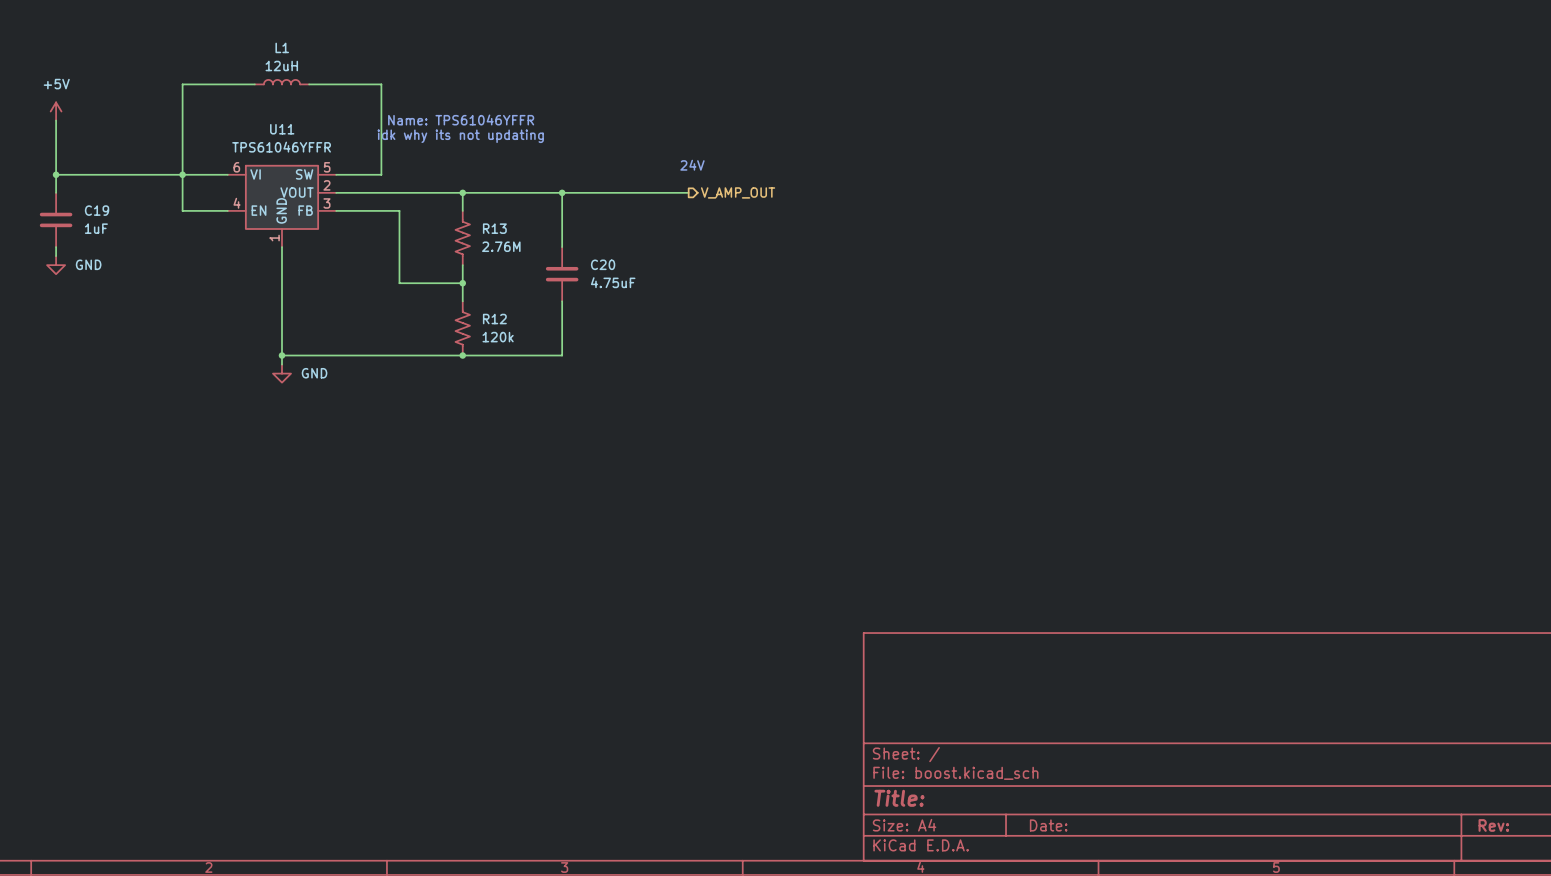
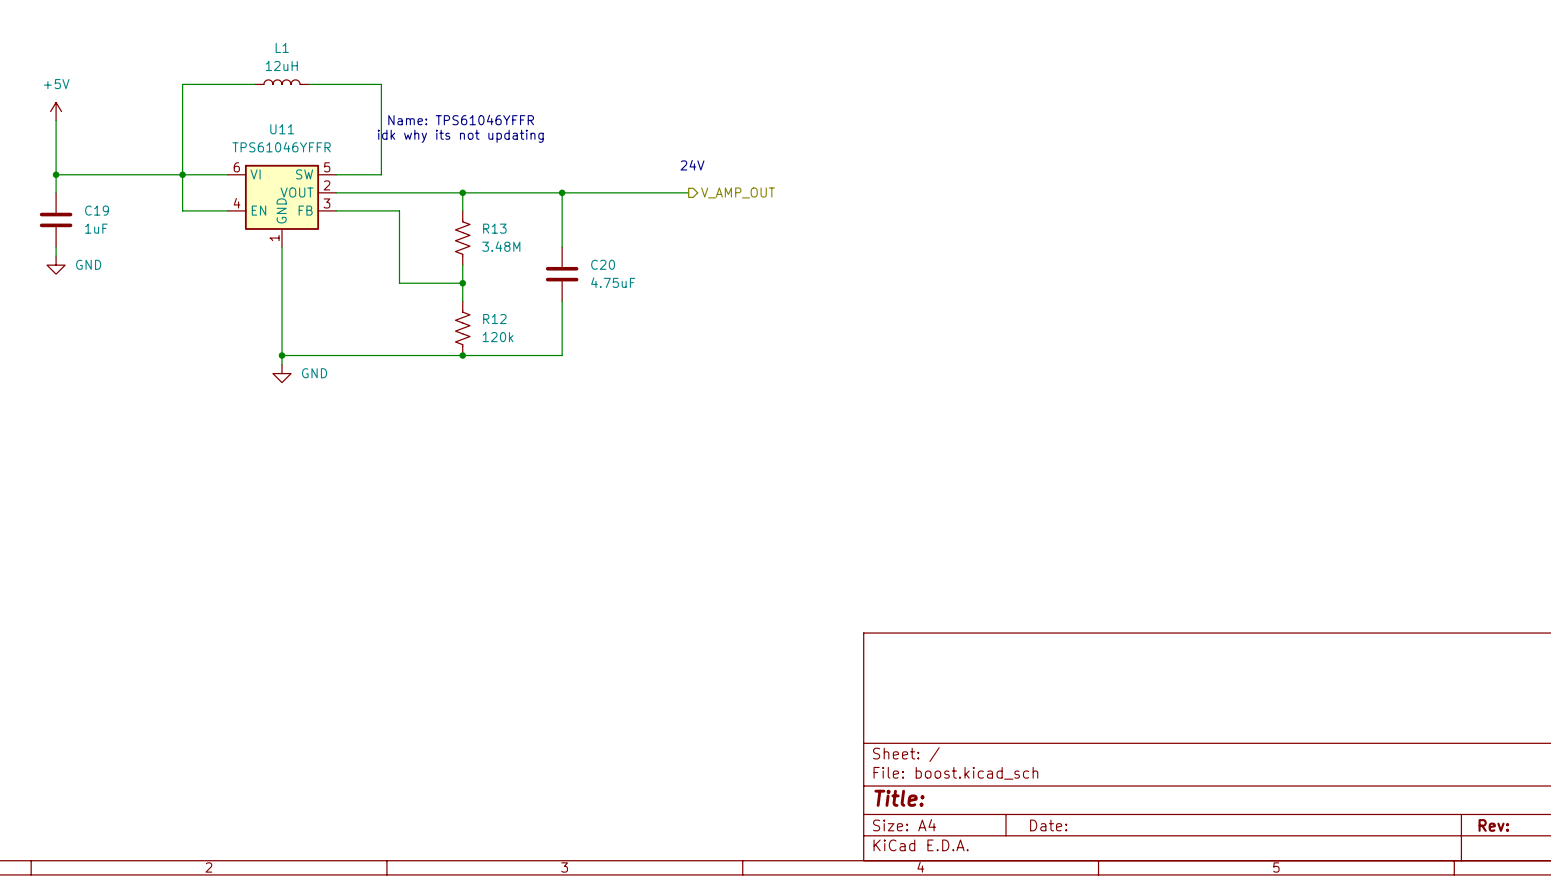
R13 value: 2.76M (501, 246) -> 3.48M (501, 246)

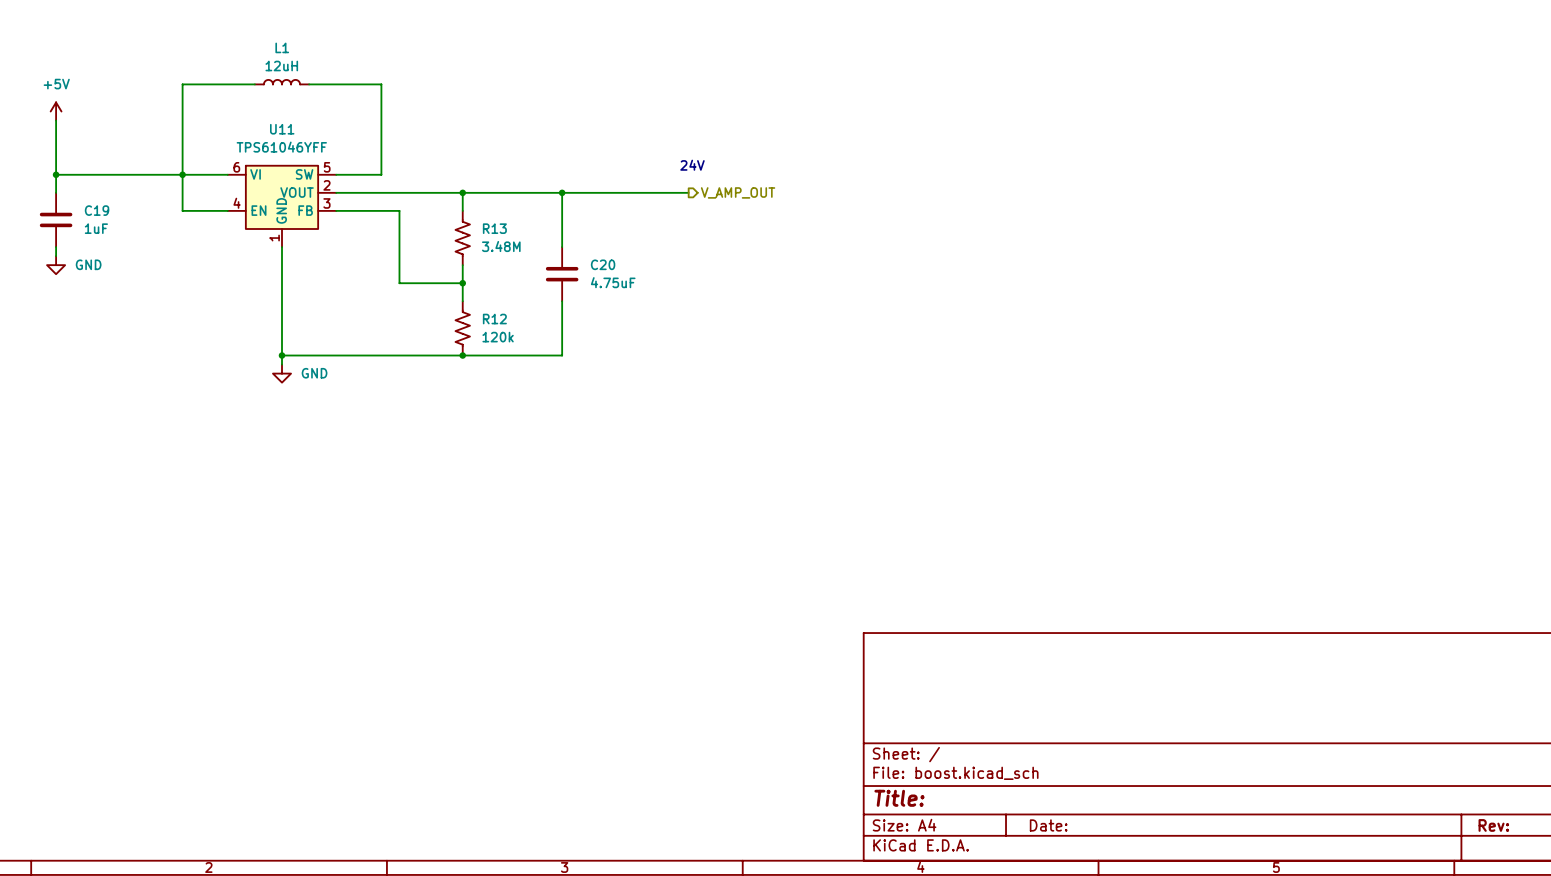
text: Name: TPS61046YFFR (461, 119) -> none
text: idk why its not updating (460, 136) -> none
U11 value: TPS61046YFFR (281, 147) -> TPS61046YFF (281, 147)

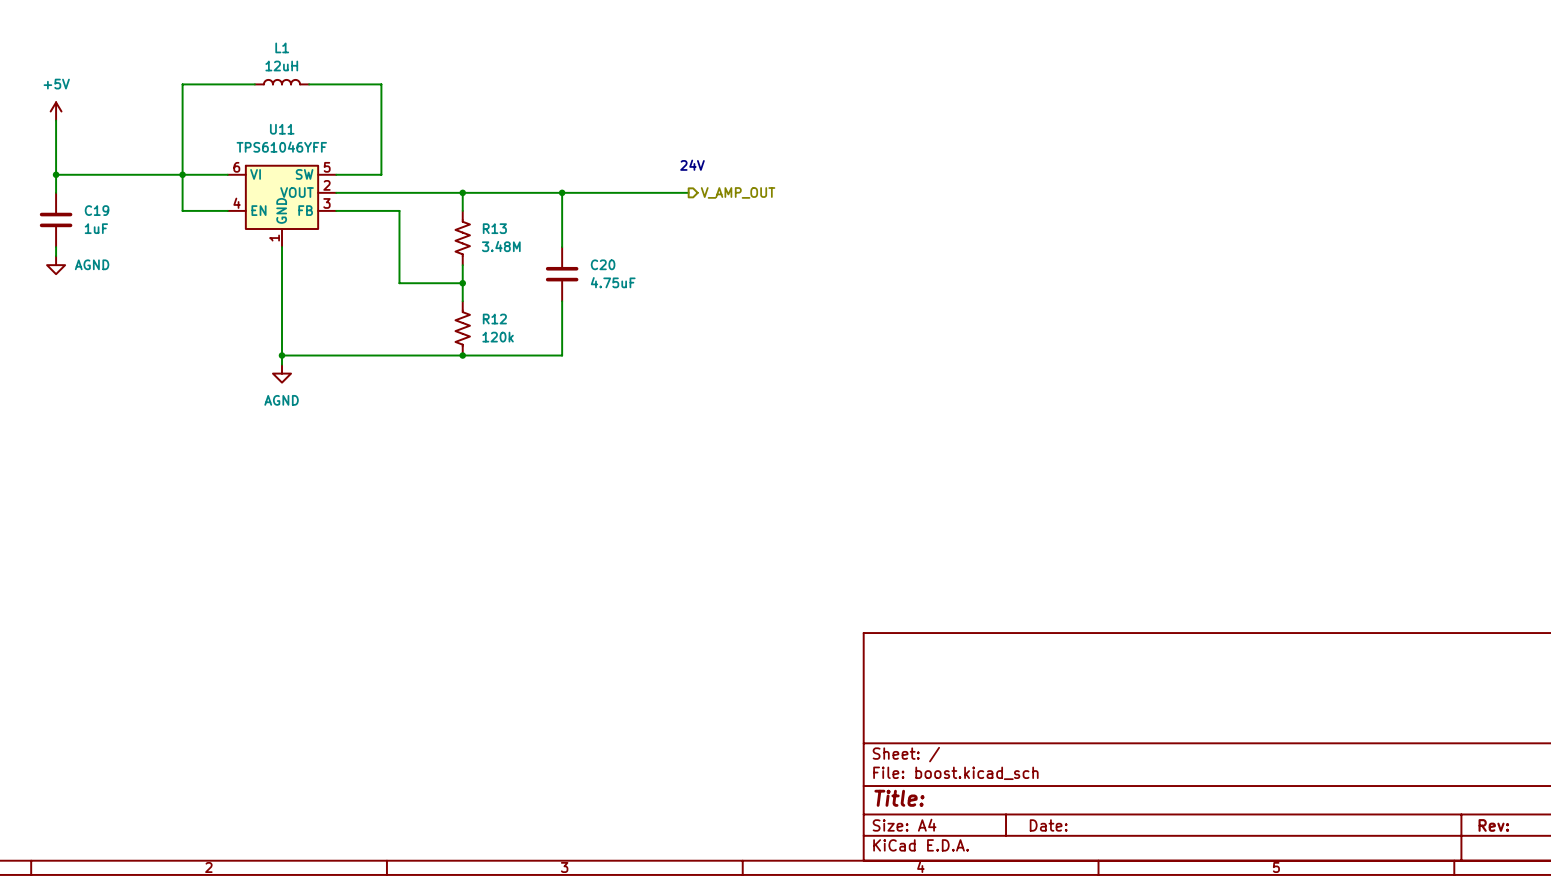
power symbol: GND (56, 265) -> AGND (56, 265)
power symbol: GND (282, 373) -> AGND (282, 373)

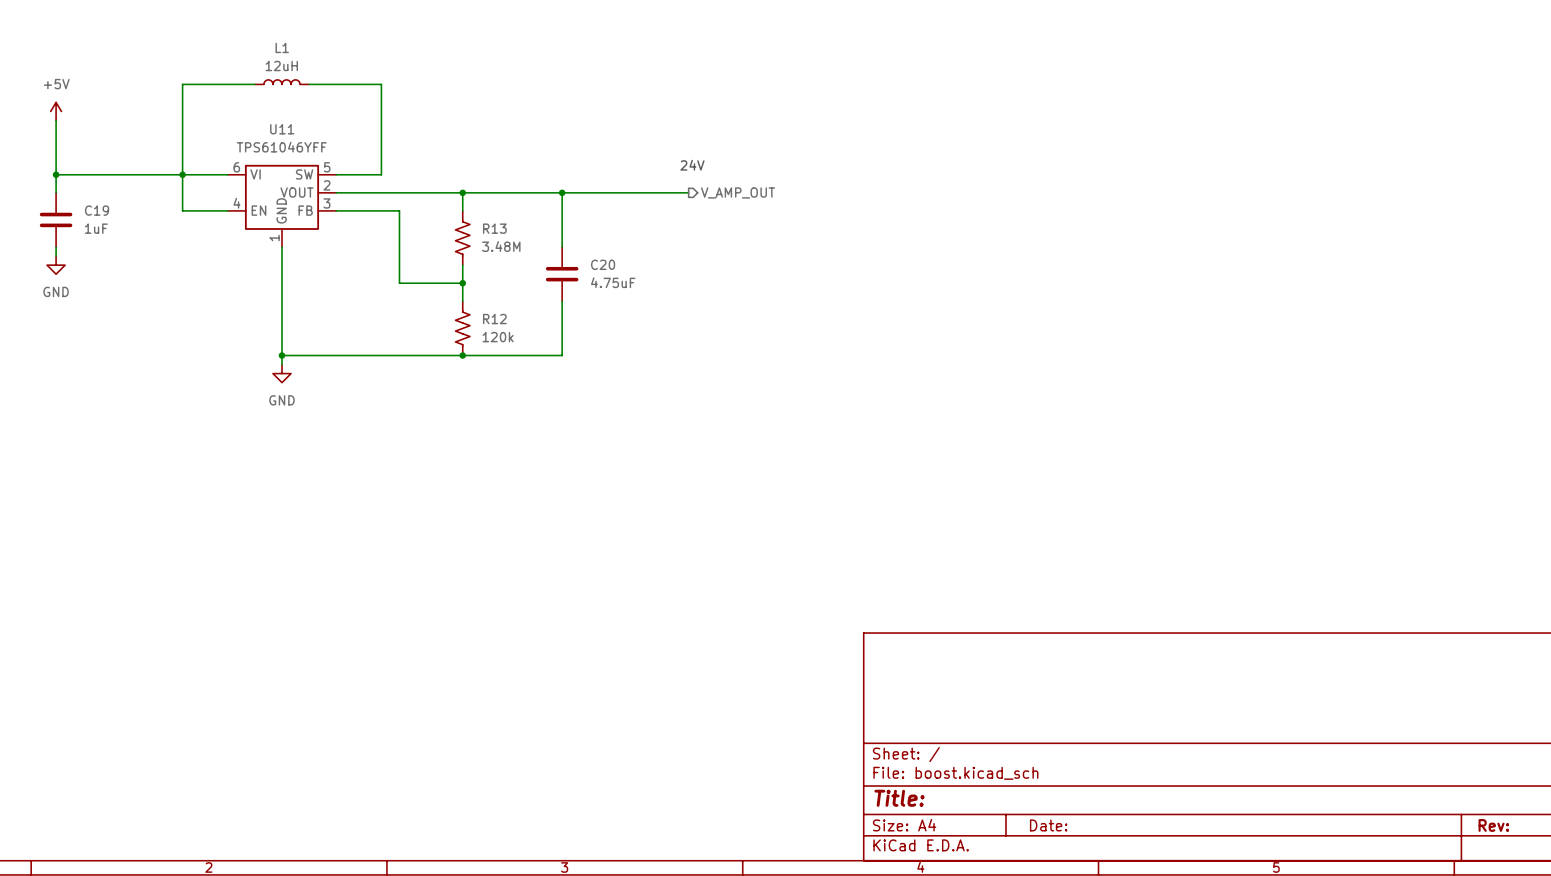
power symbol: AGND (56, 265) -> GND (56, 265)
power symbol: AGND (282, 373) -> GND (282, 373)

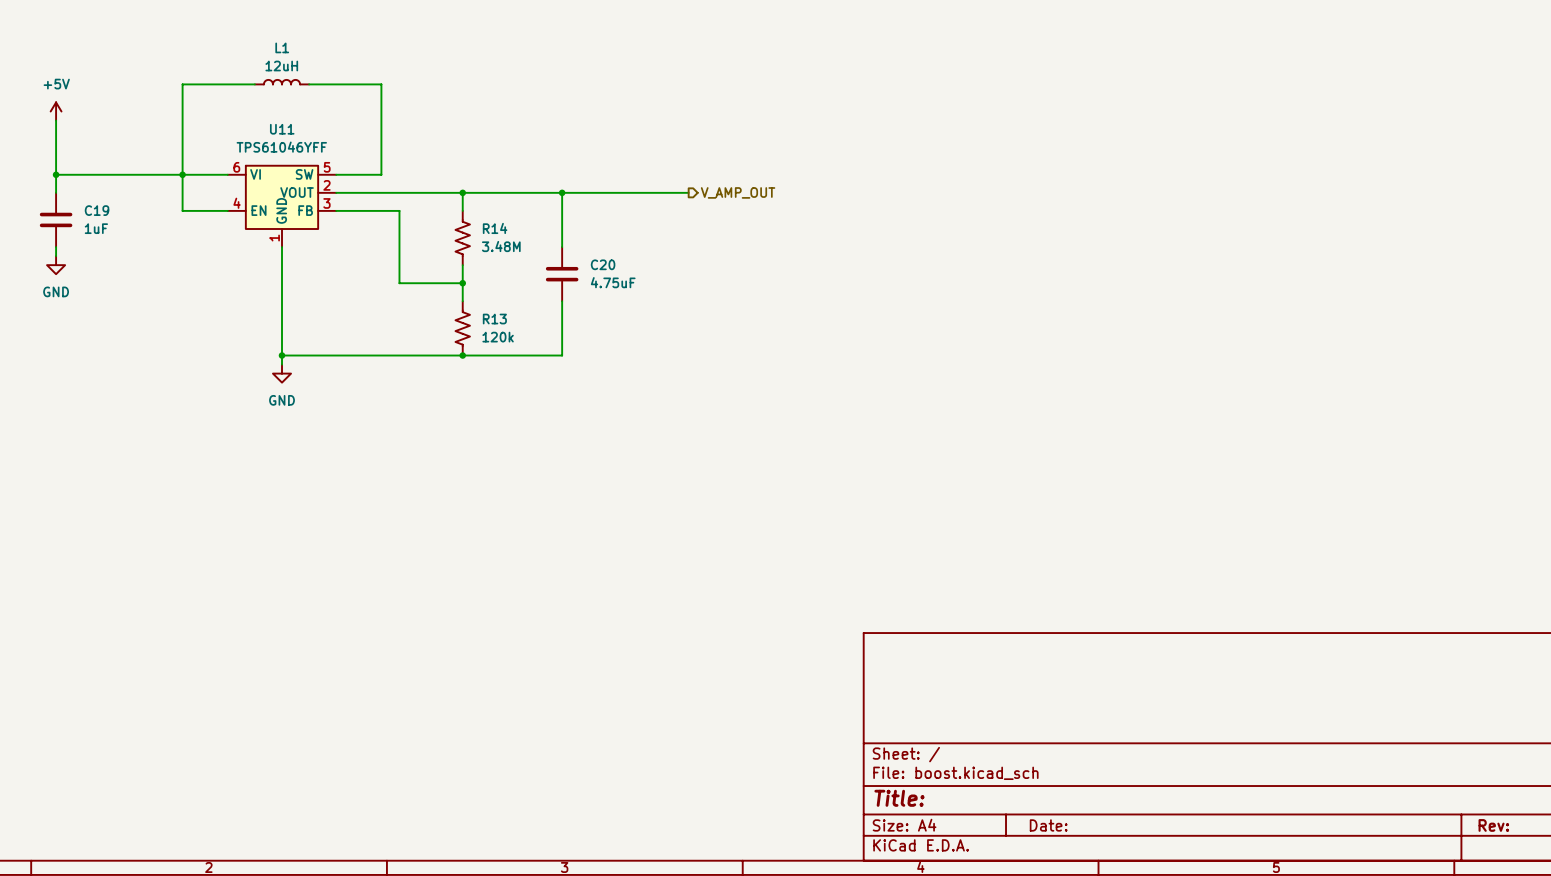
text: 24V (692, 165) -> none
R13 name: R13 (494, 228) -> R14 (495, 228)
R12 name: R12 (494, 319) -> R13 (494, 319)

